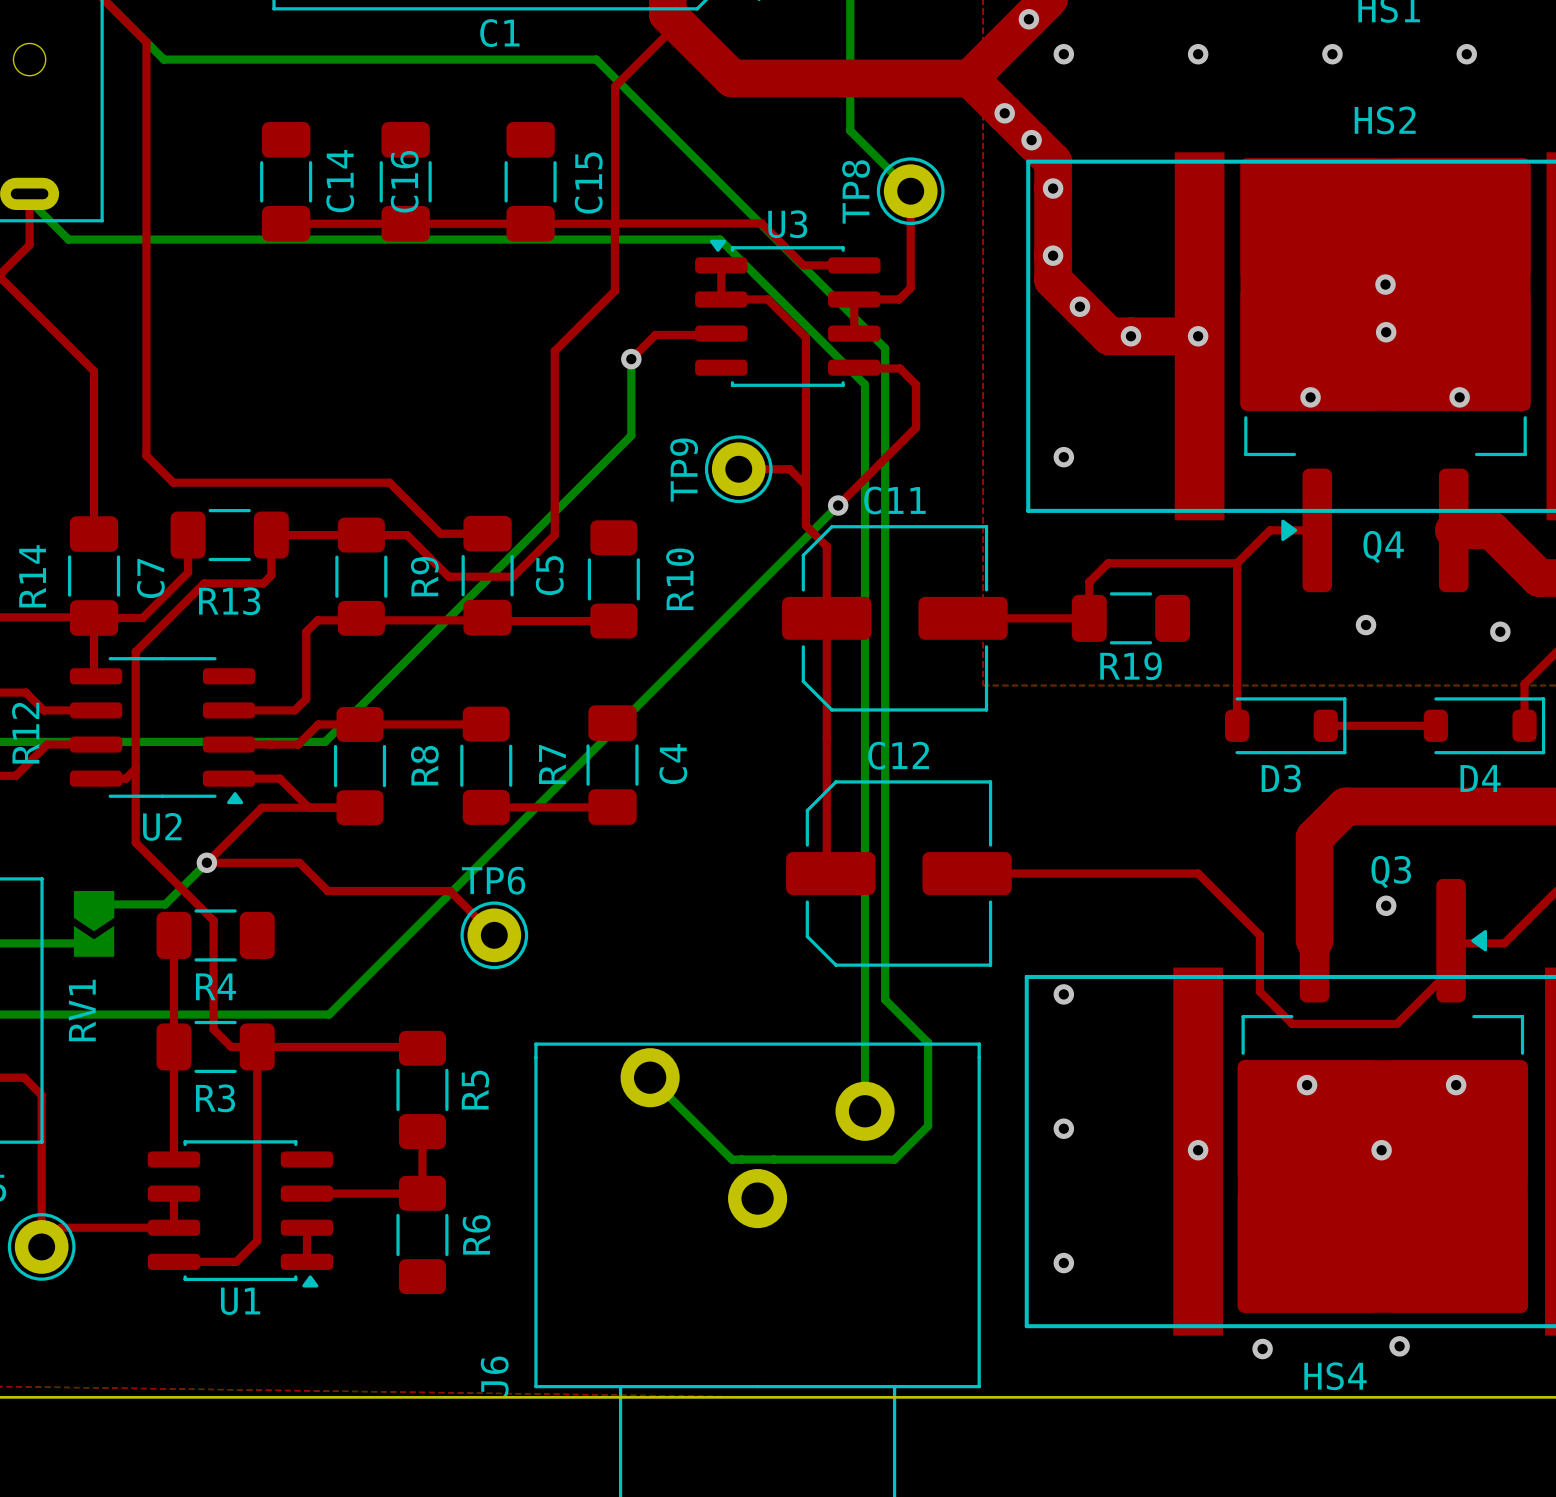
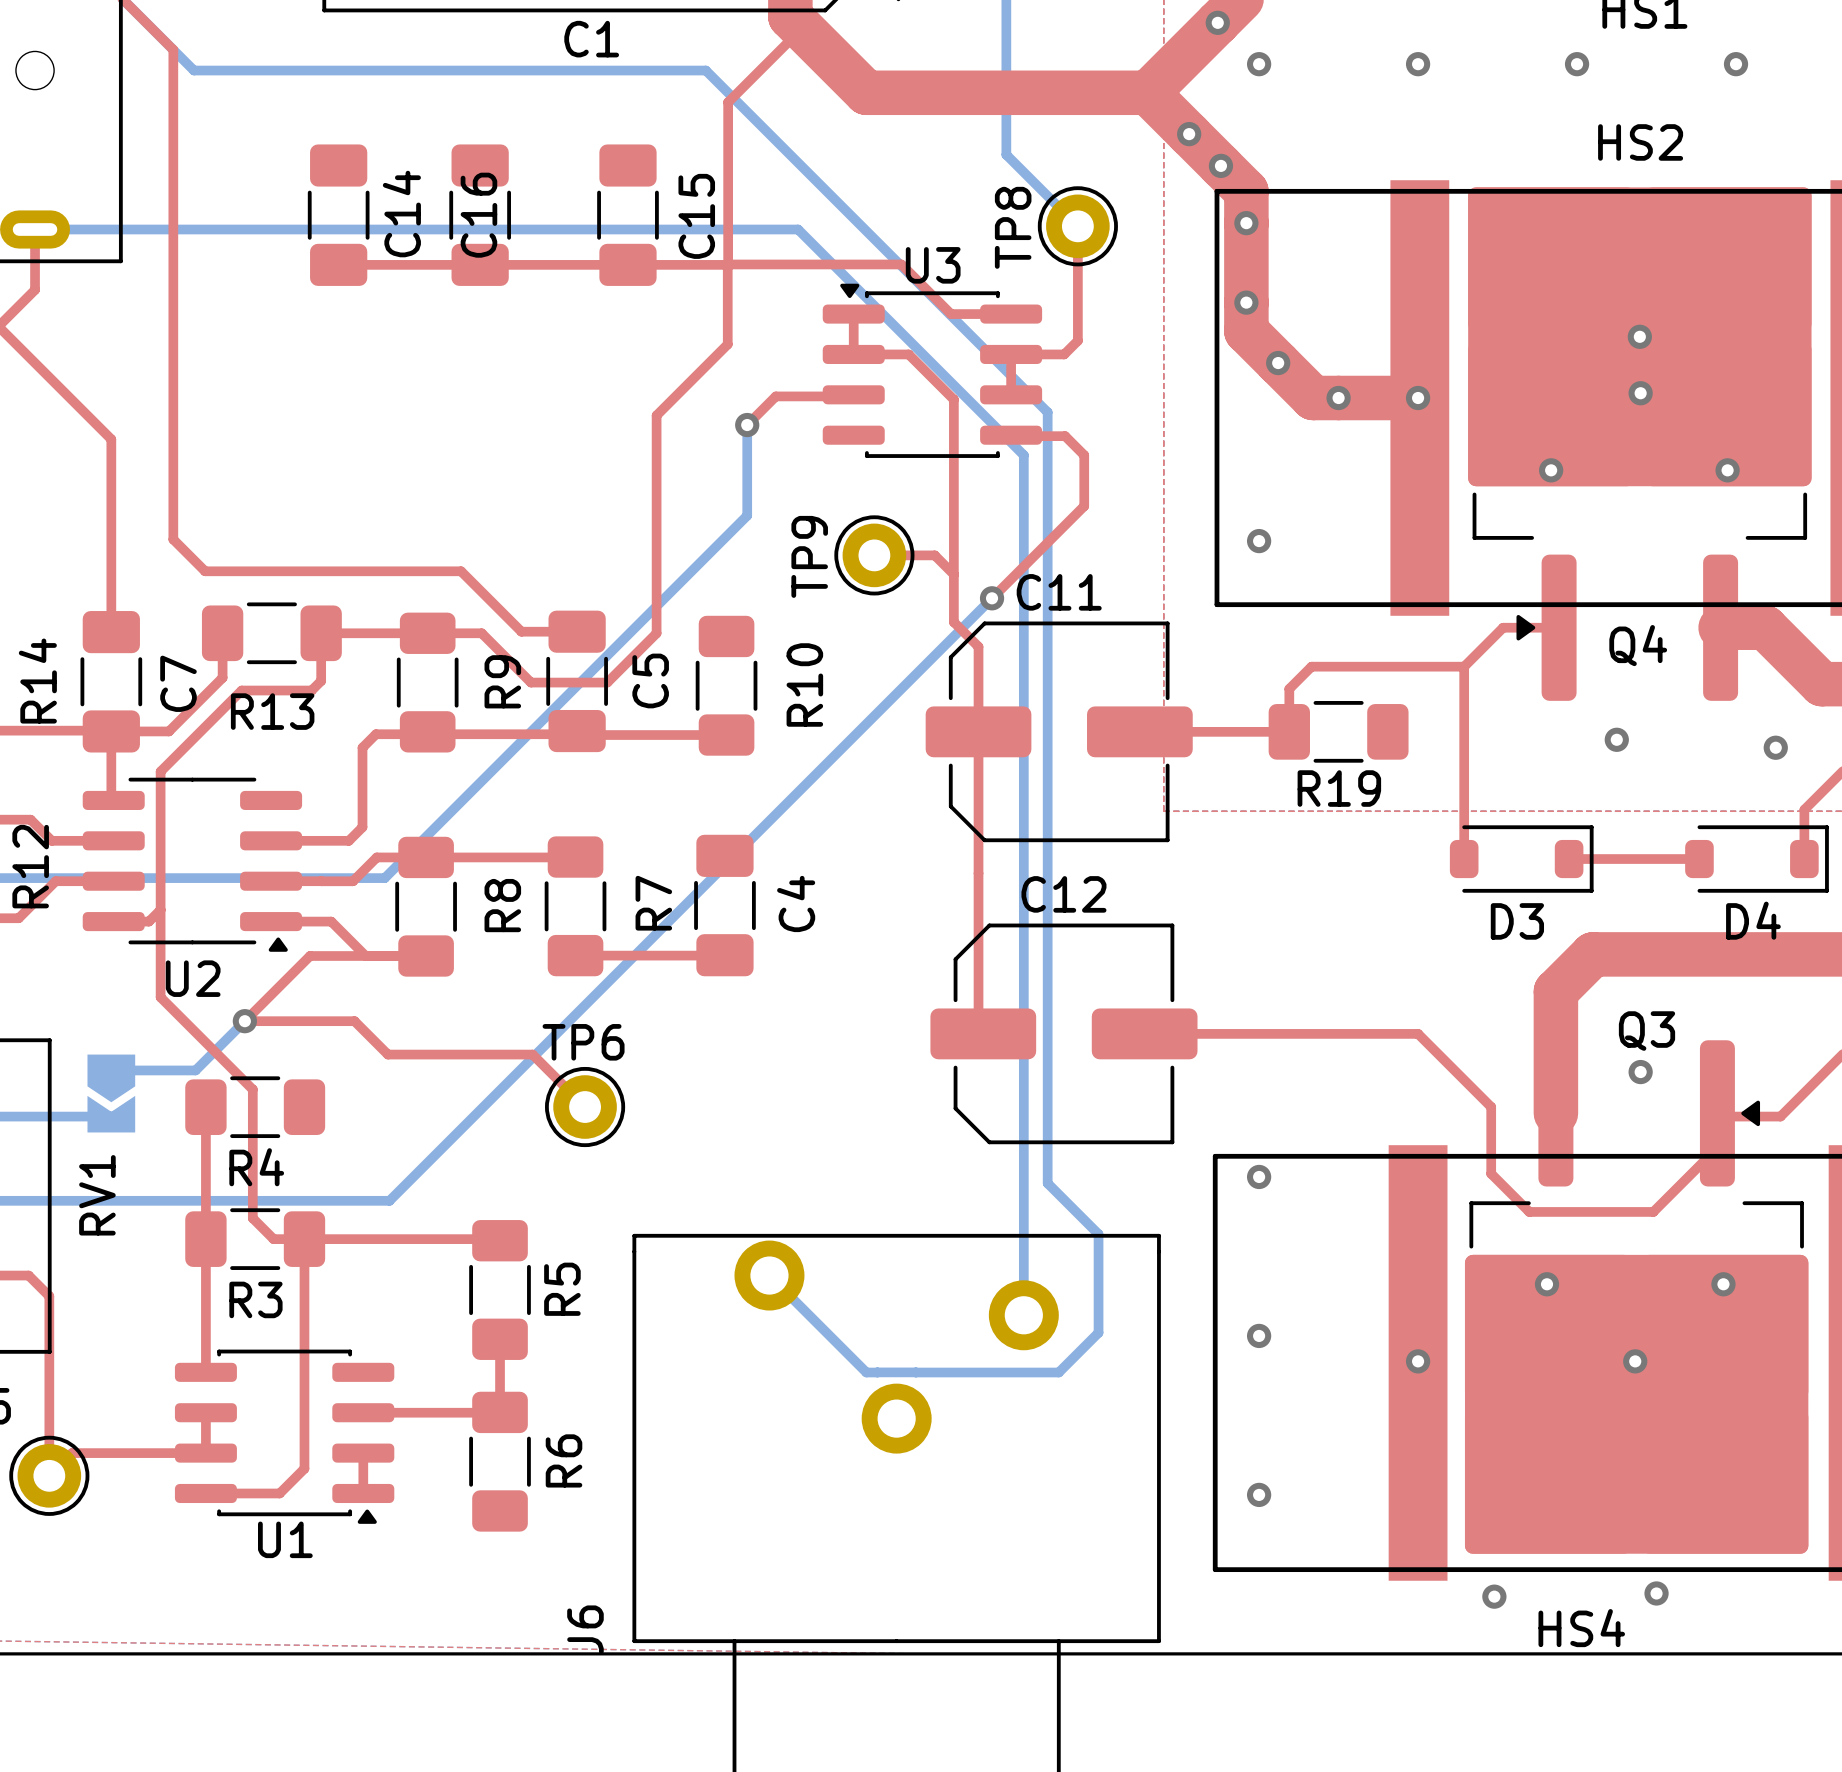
bottom track: (29, 193) (29, 200) (68, 239) (719, 239) -> (35, 229) (798, 229) (852, 283)

